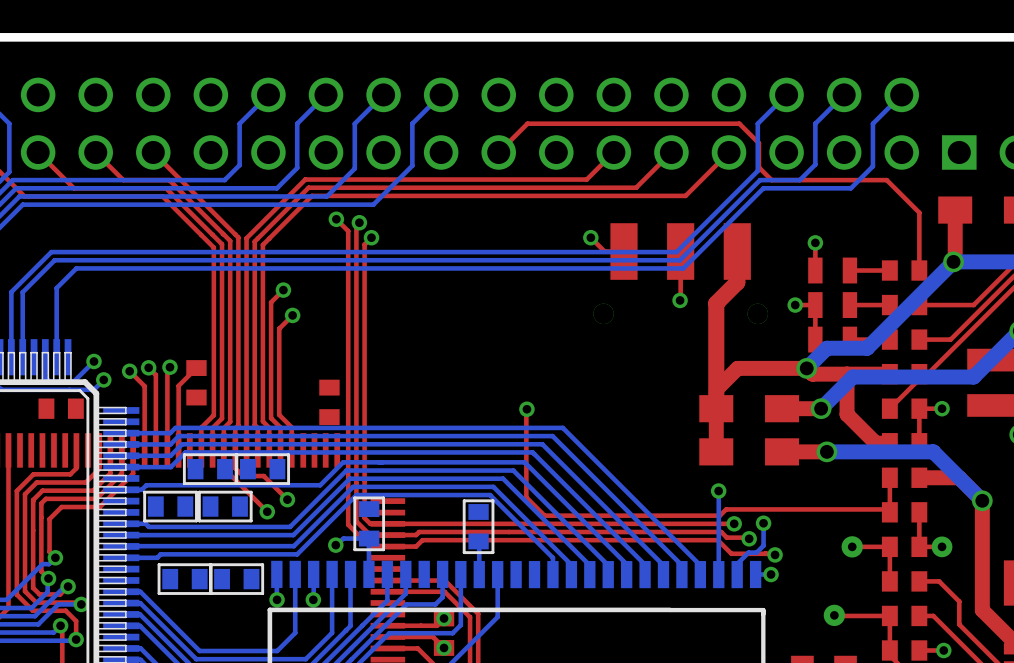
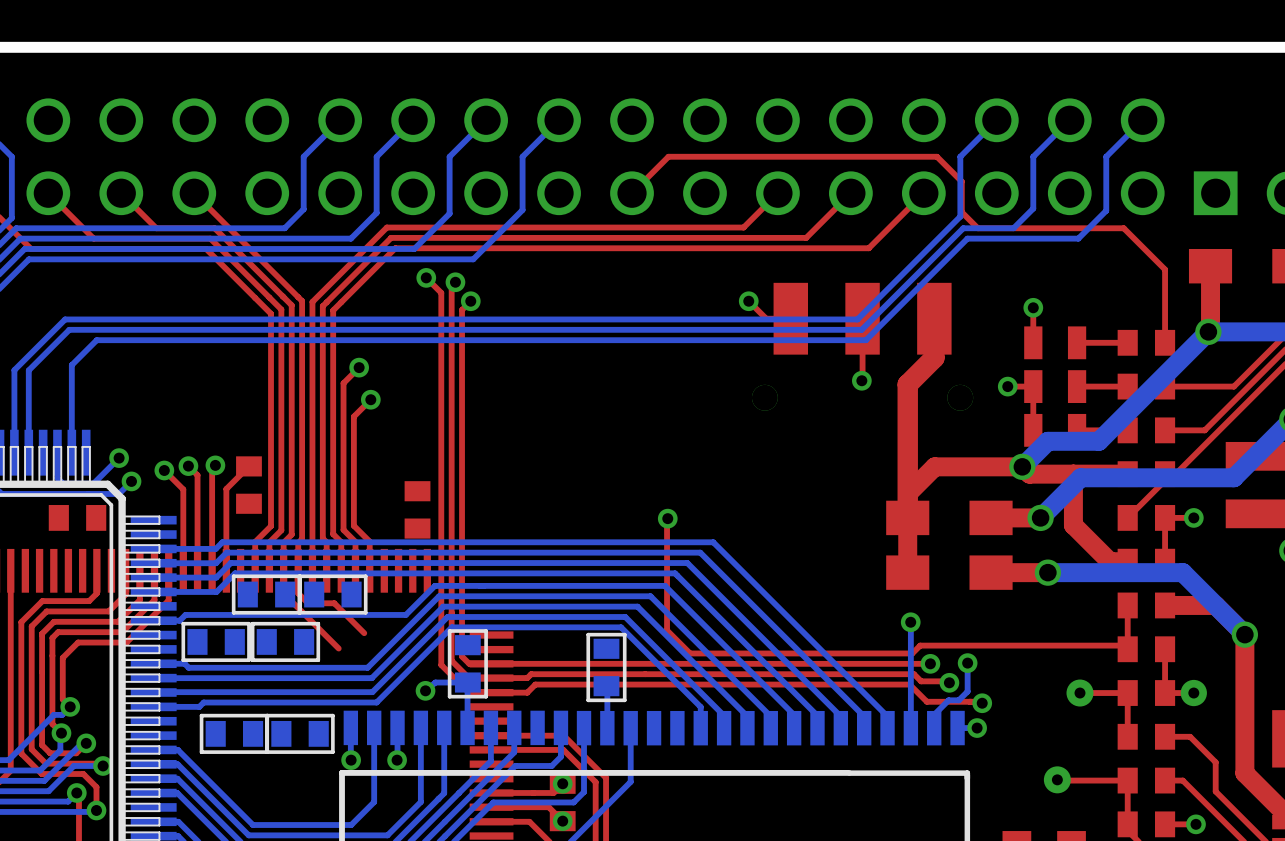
via: (287, 499) -> none
via: (267, 511) -> none

